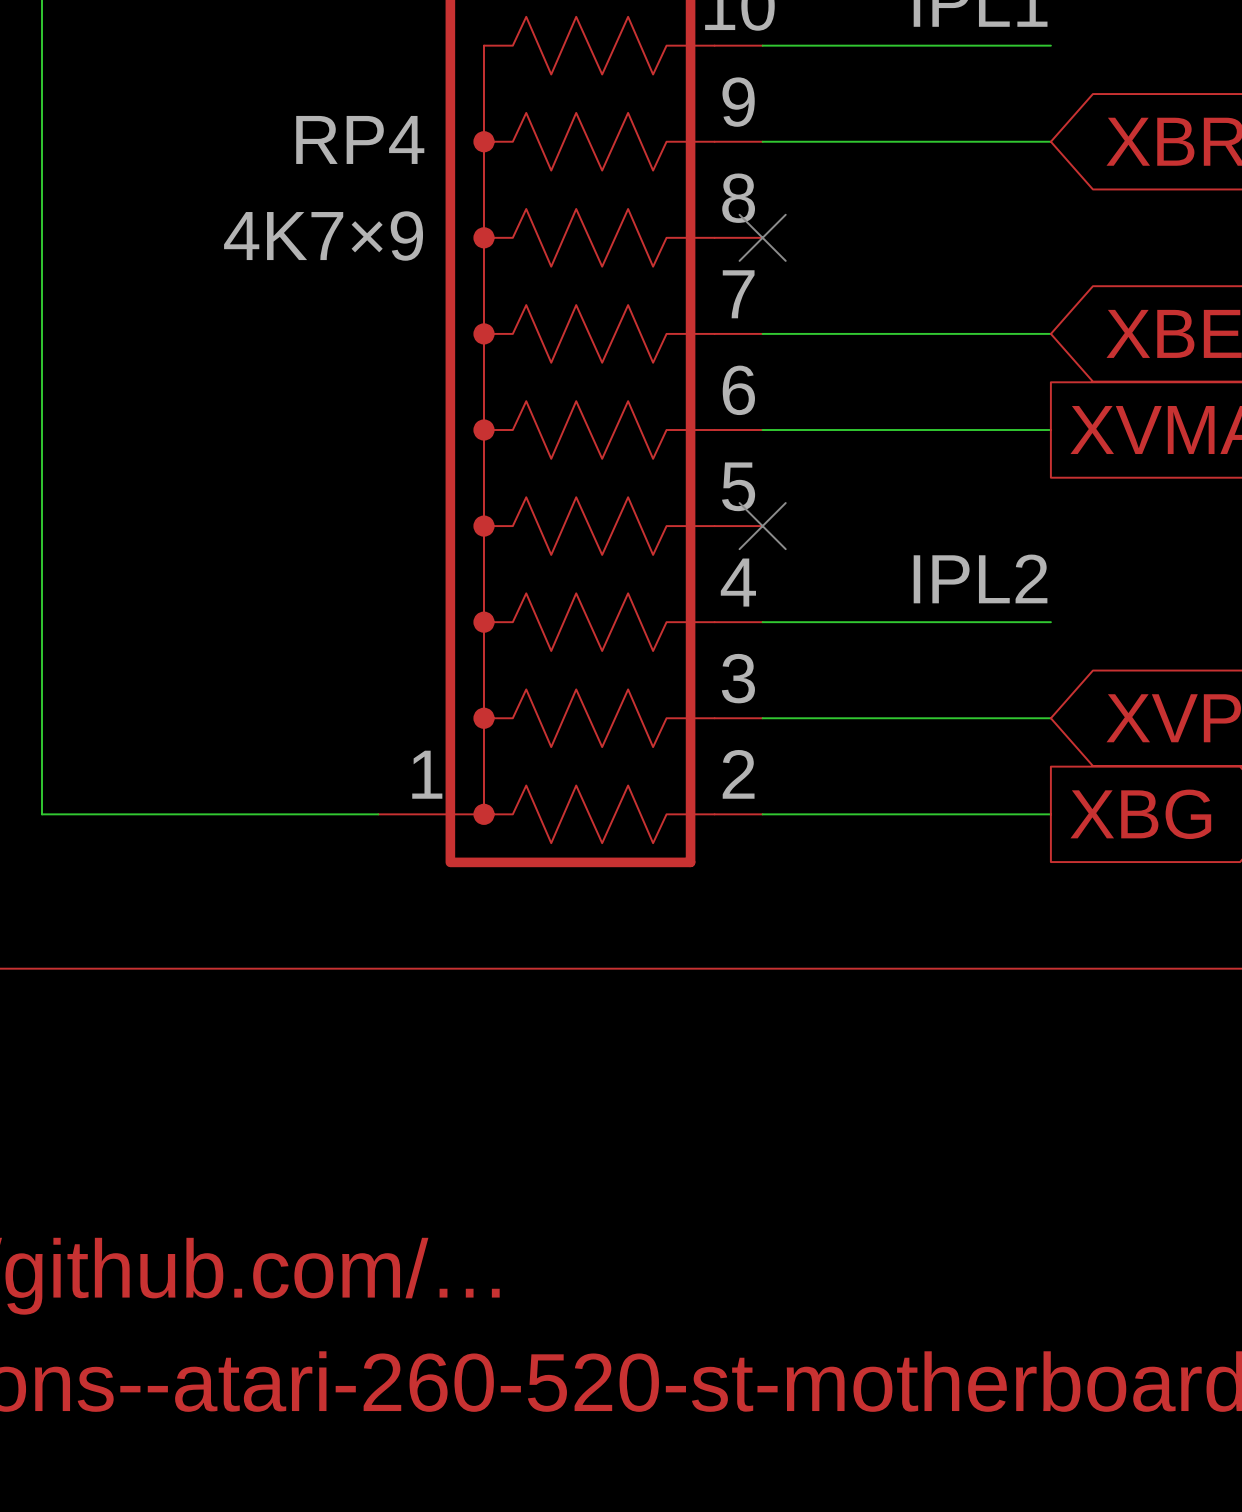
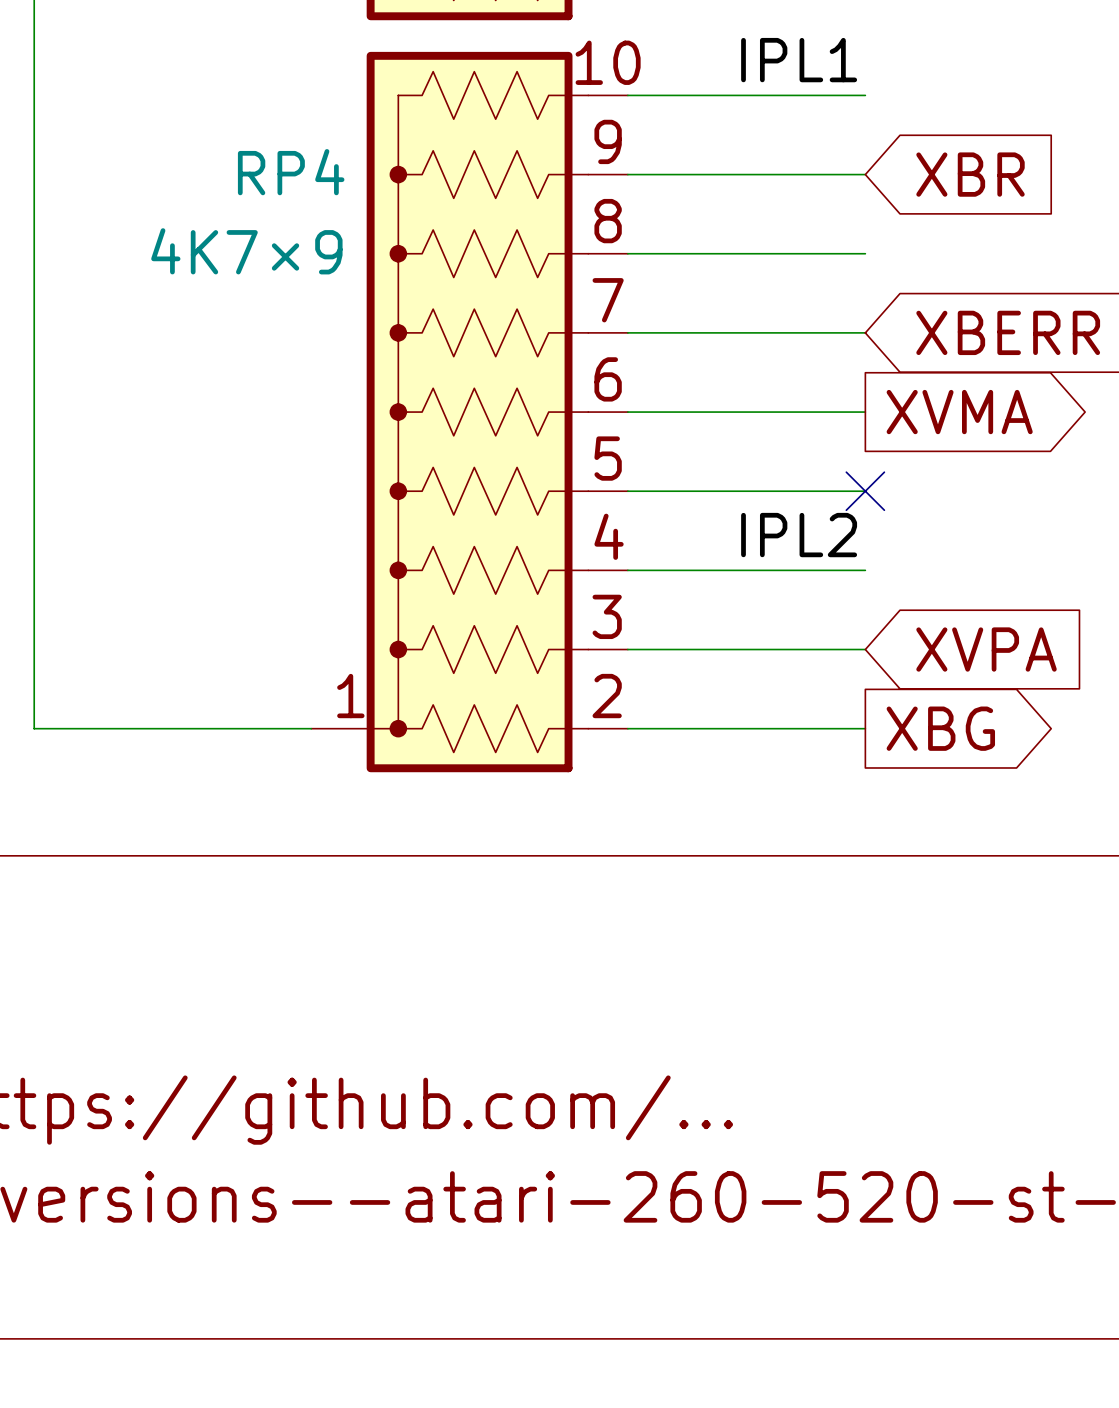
wire: none -> (627, 253) (865, 253)
no-connect mark: (762, 237) -> none
wire: none -> (627, 491) (865, 491)
no-connect mark: (762, 526) -> none
no-connect mark: none -> (865, 491)

